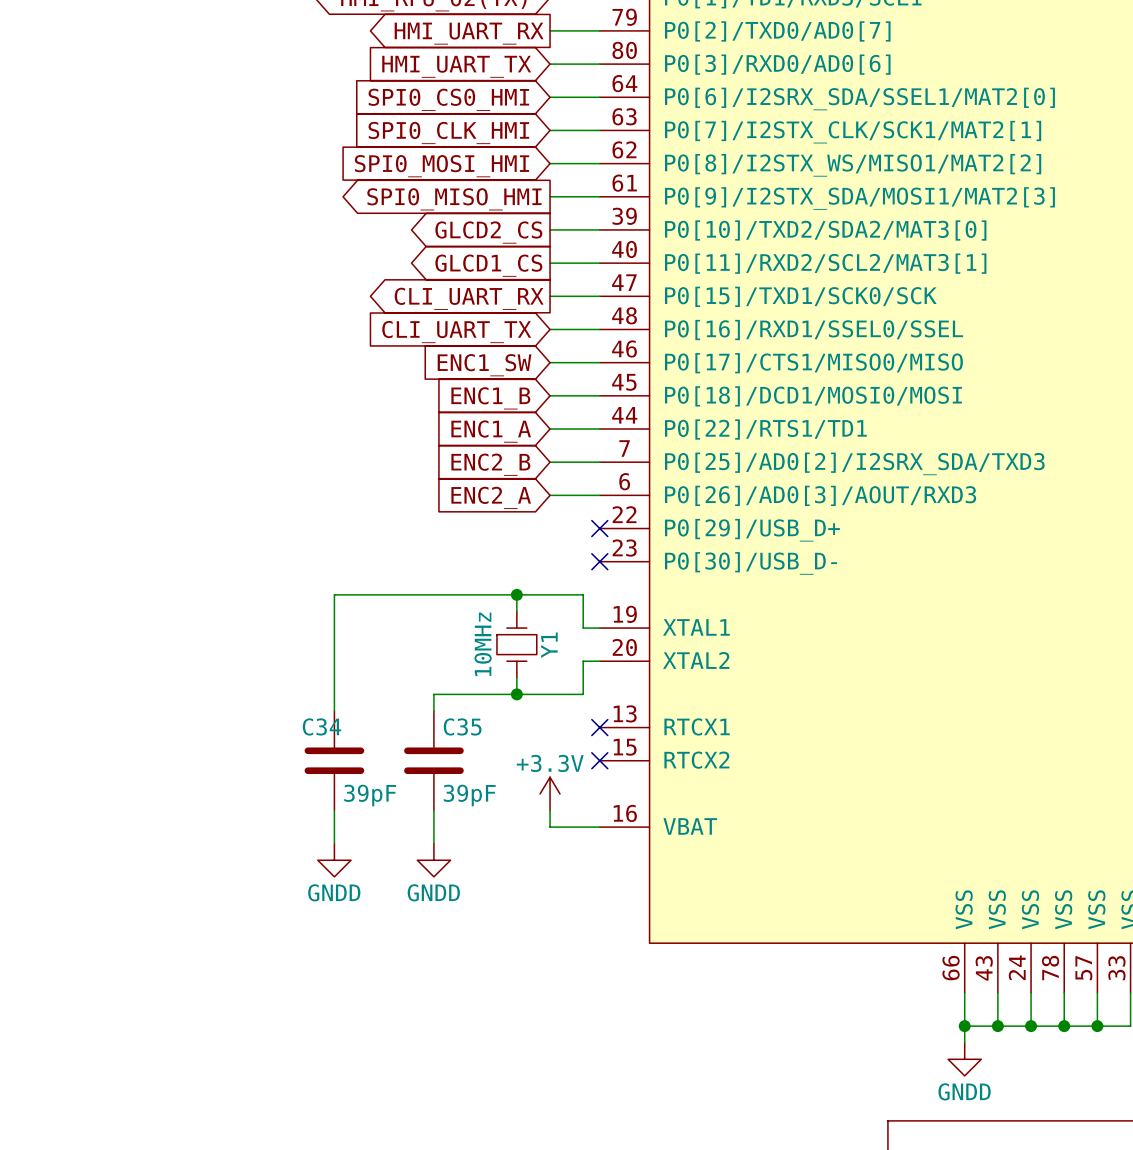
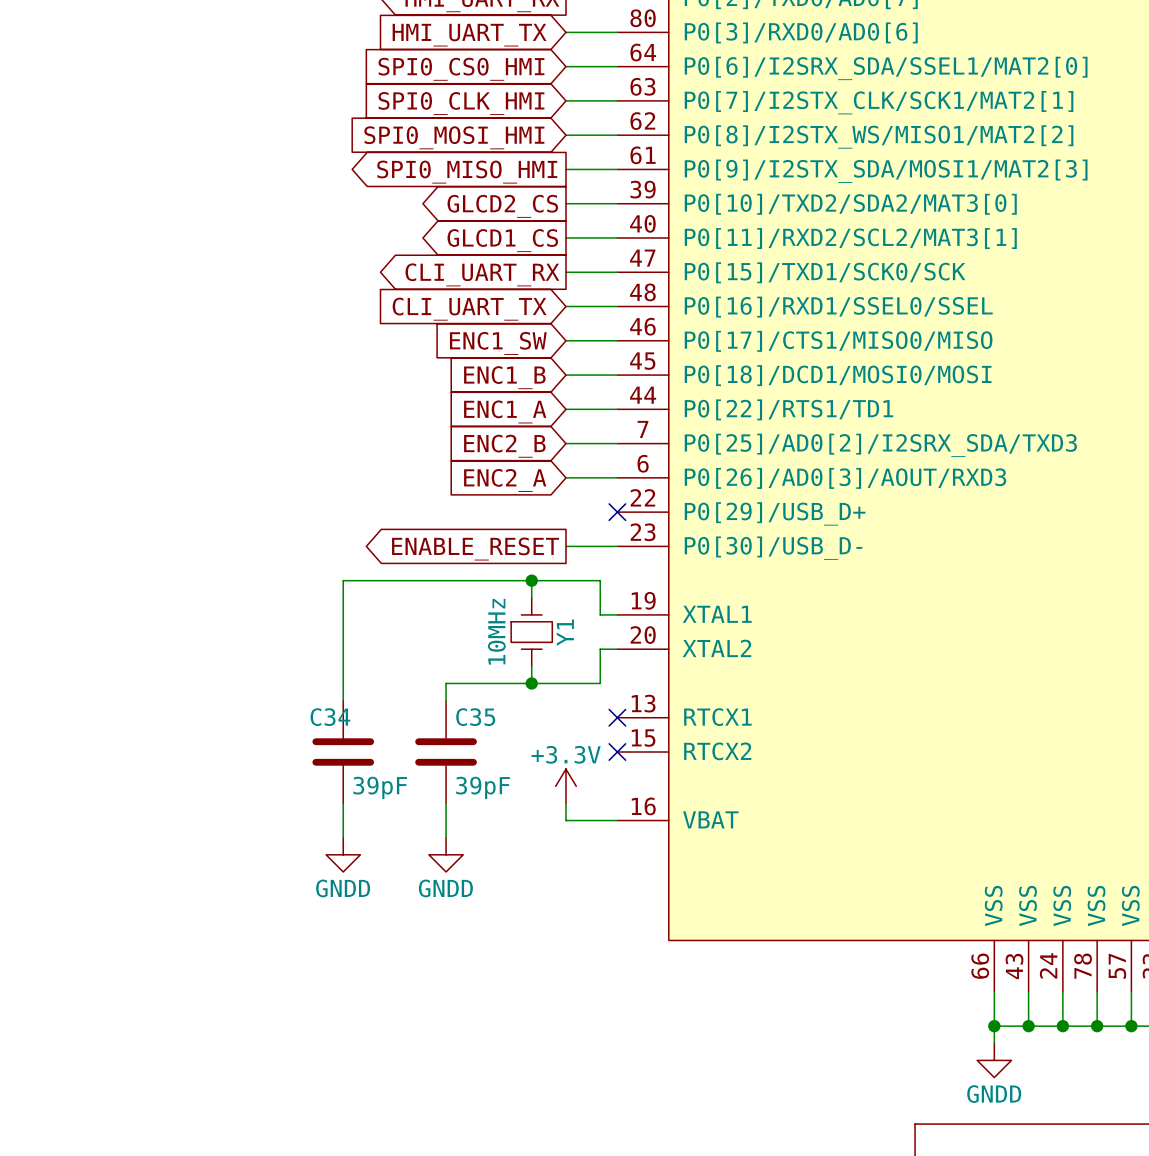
wire: none -> (565, 546) (617, 546)
no-connect mark: (599, 561) -> none
global label: none -> ENABLE_RESET (475, 549)

